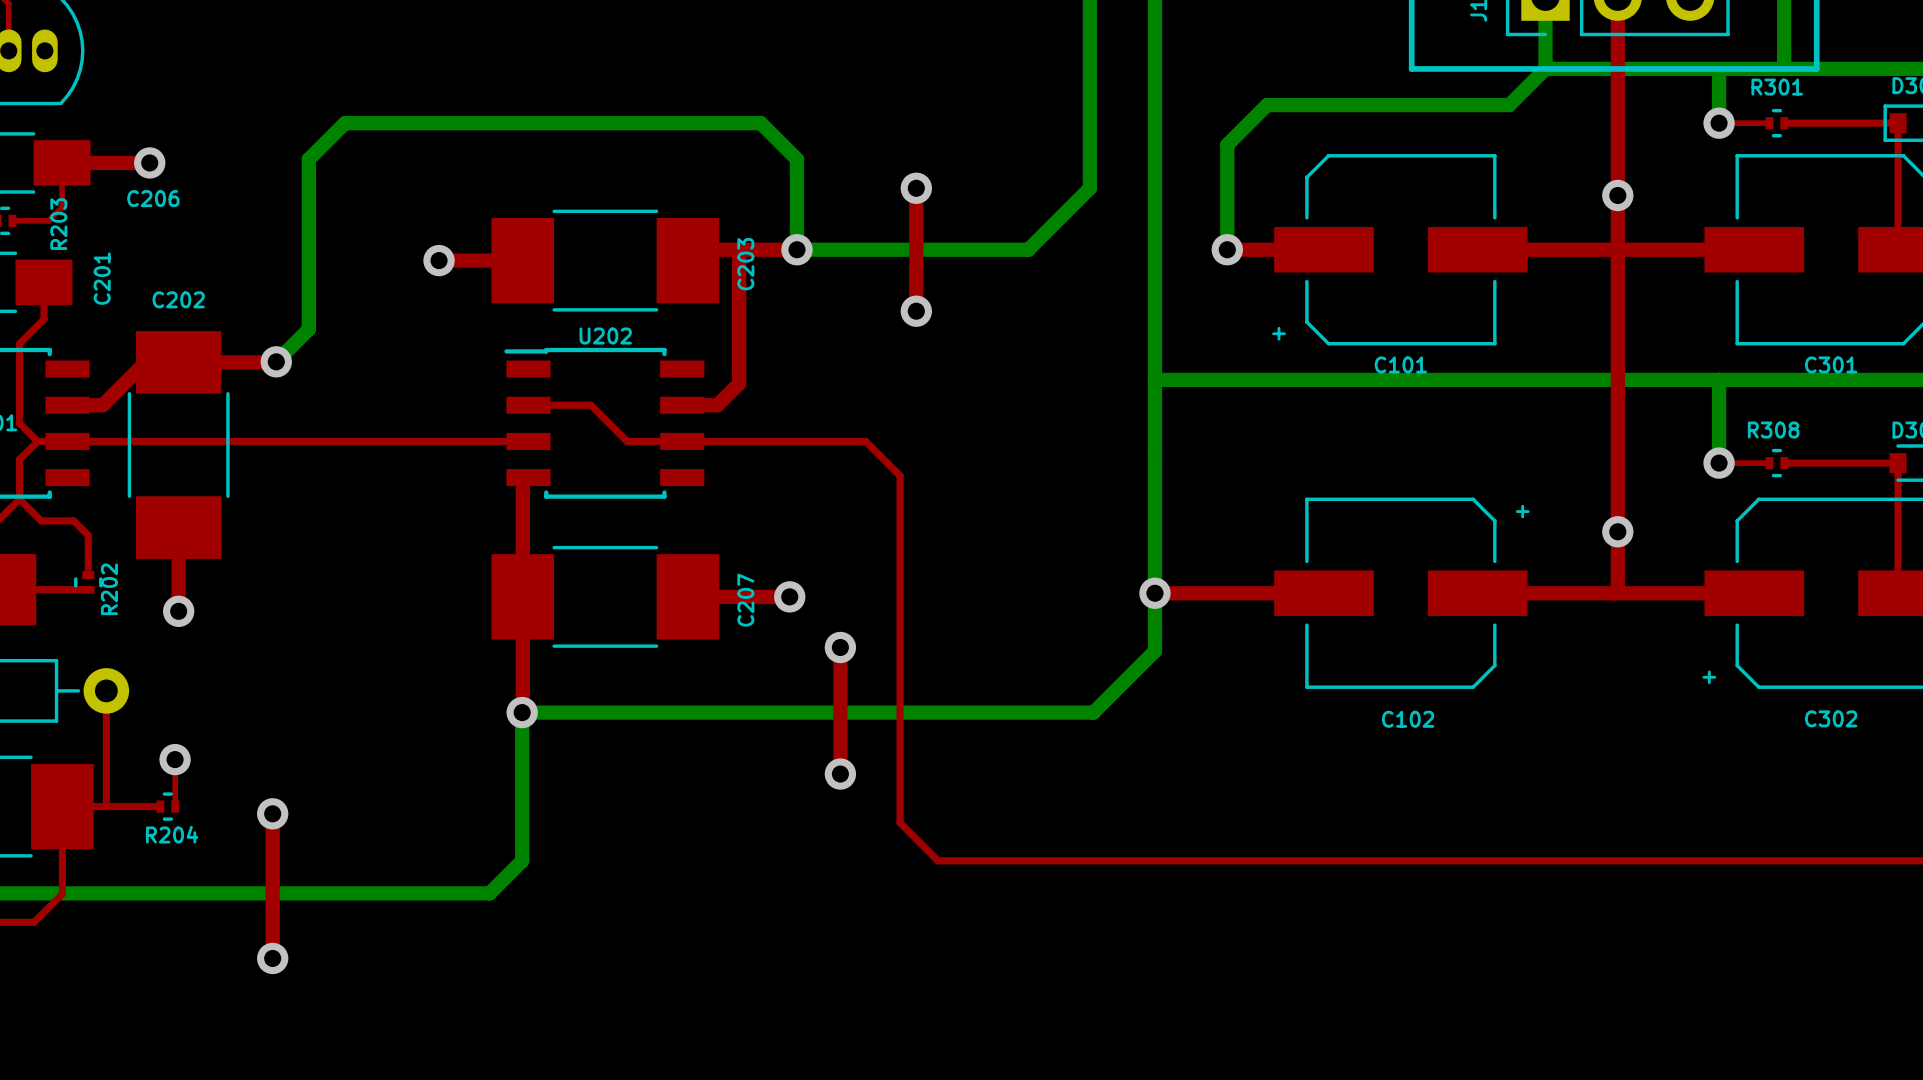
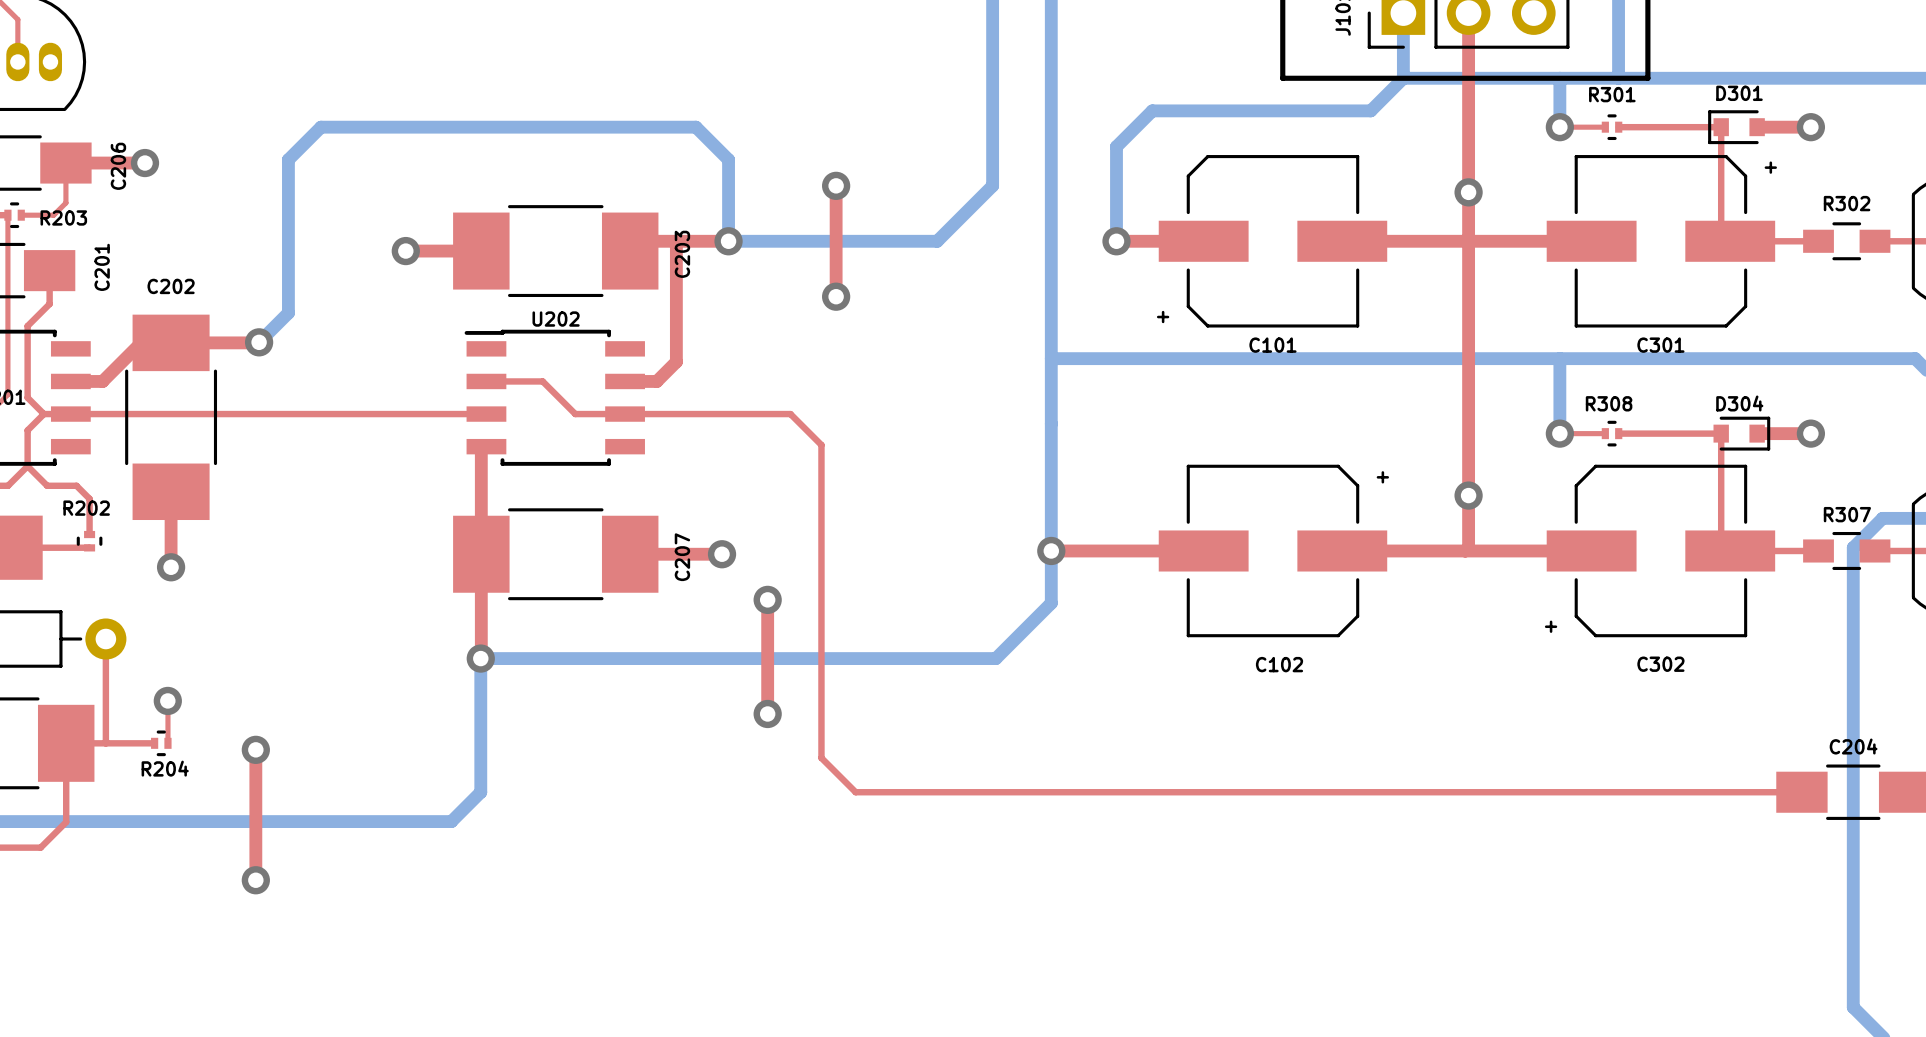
C206 name rotation: 0° (153, 198) -> 90° counterclockwise (118, 166)
R203 name rotation: 0° (58, 224) -> 90° clockwise (63, 217)
R202 name rotation: 0° (109, 589) -> 90° clockwise (86, 508)

